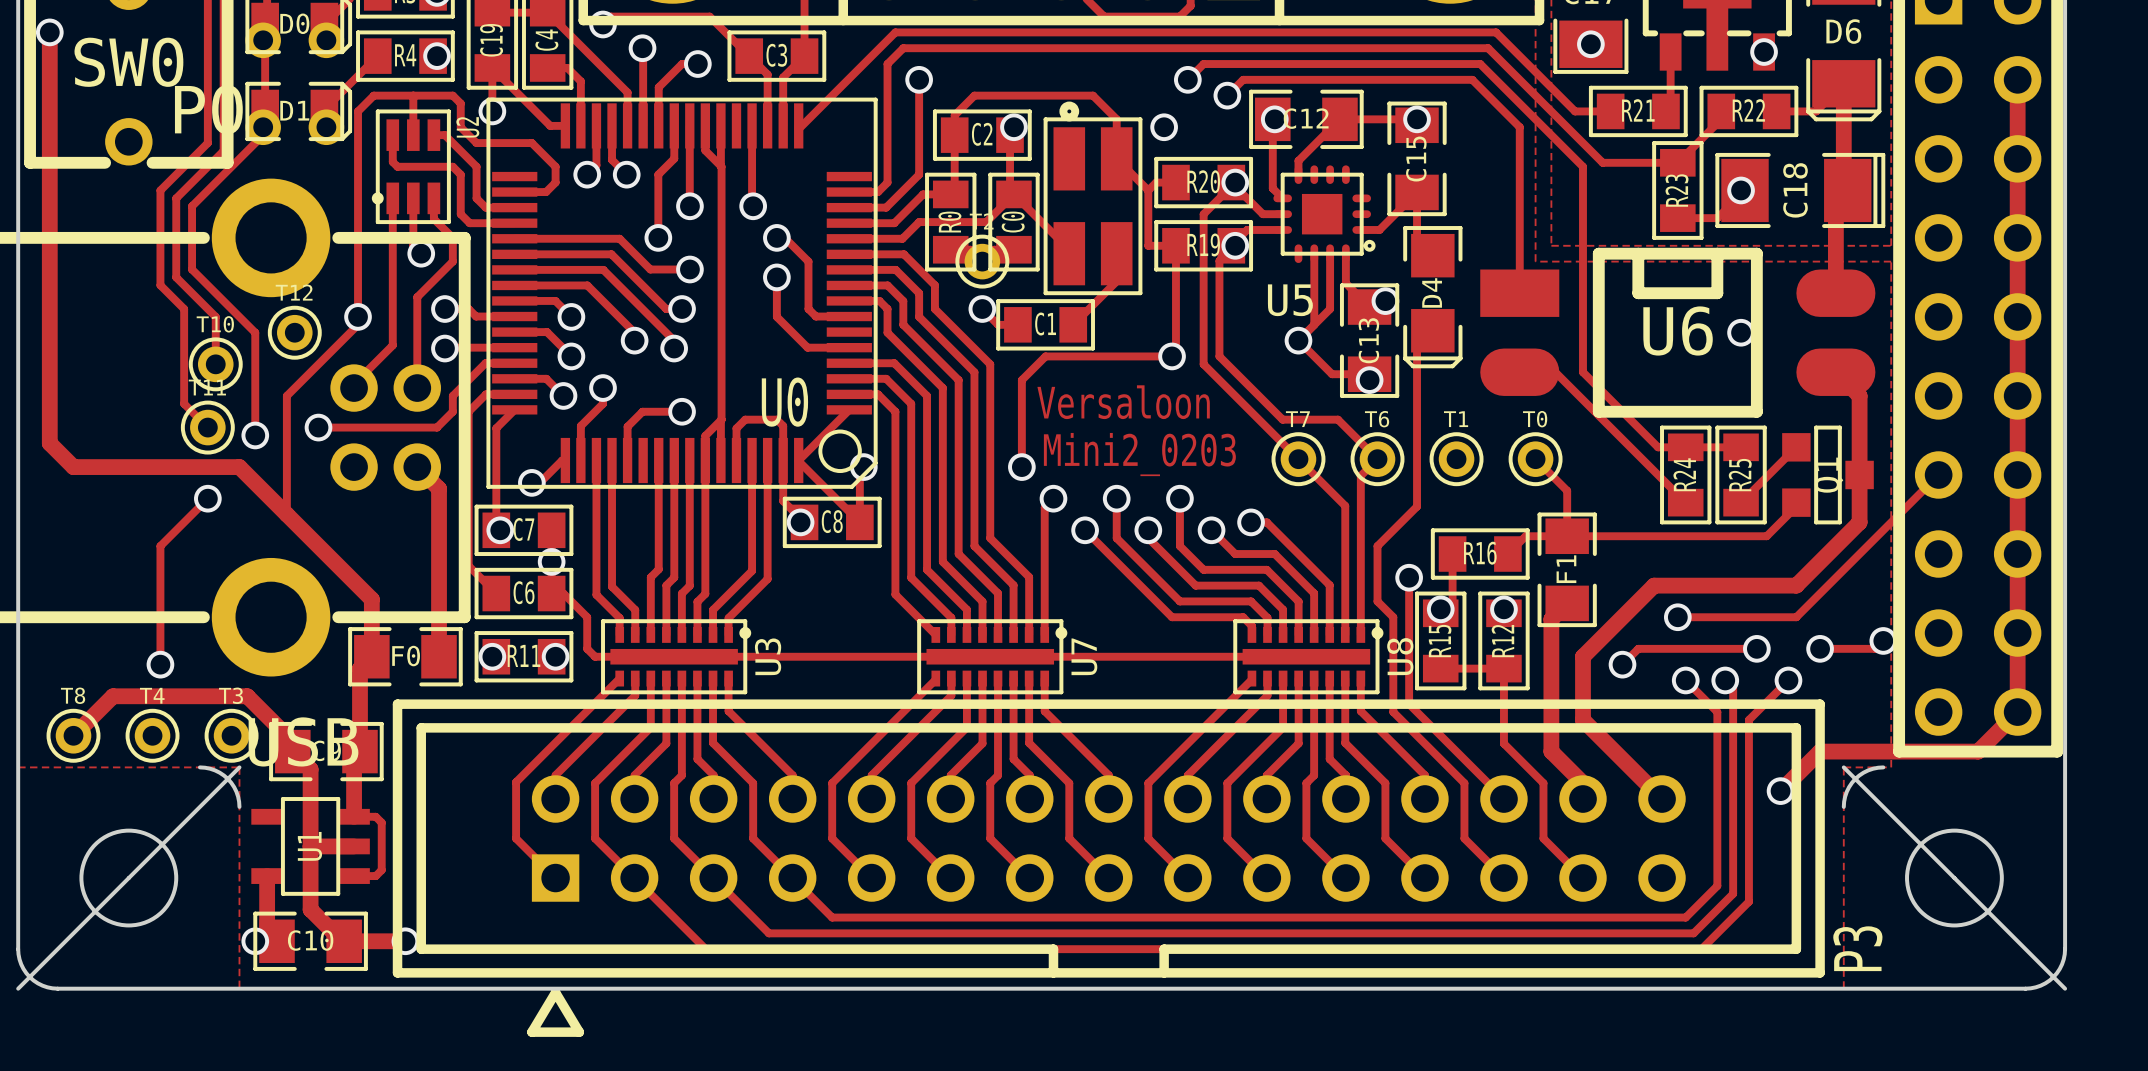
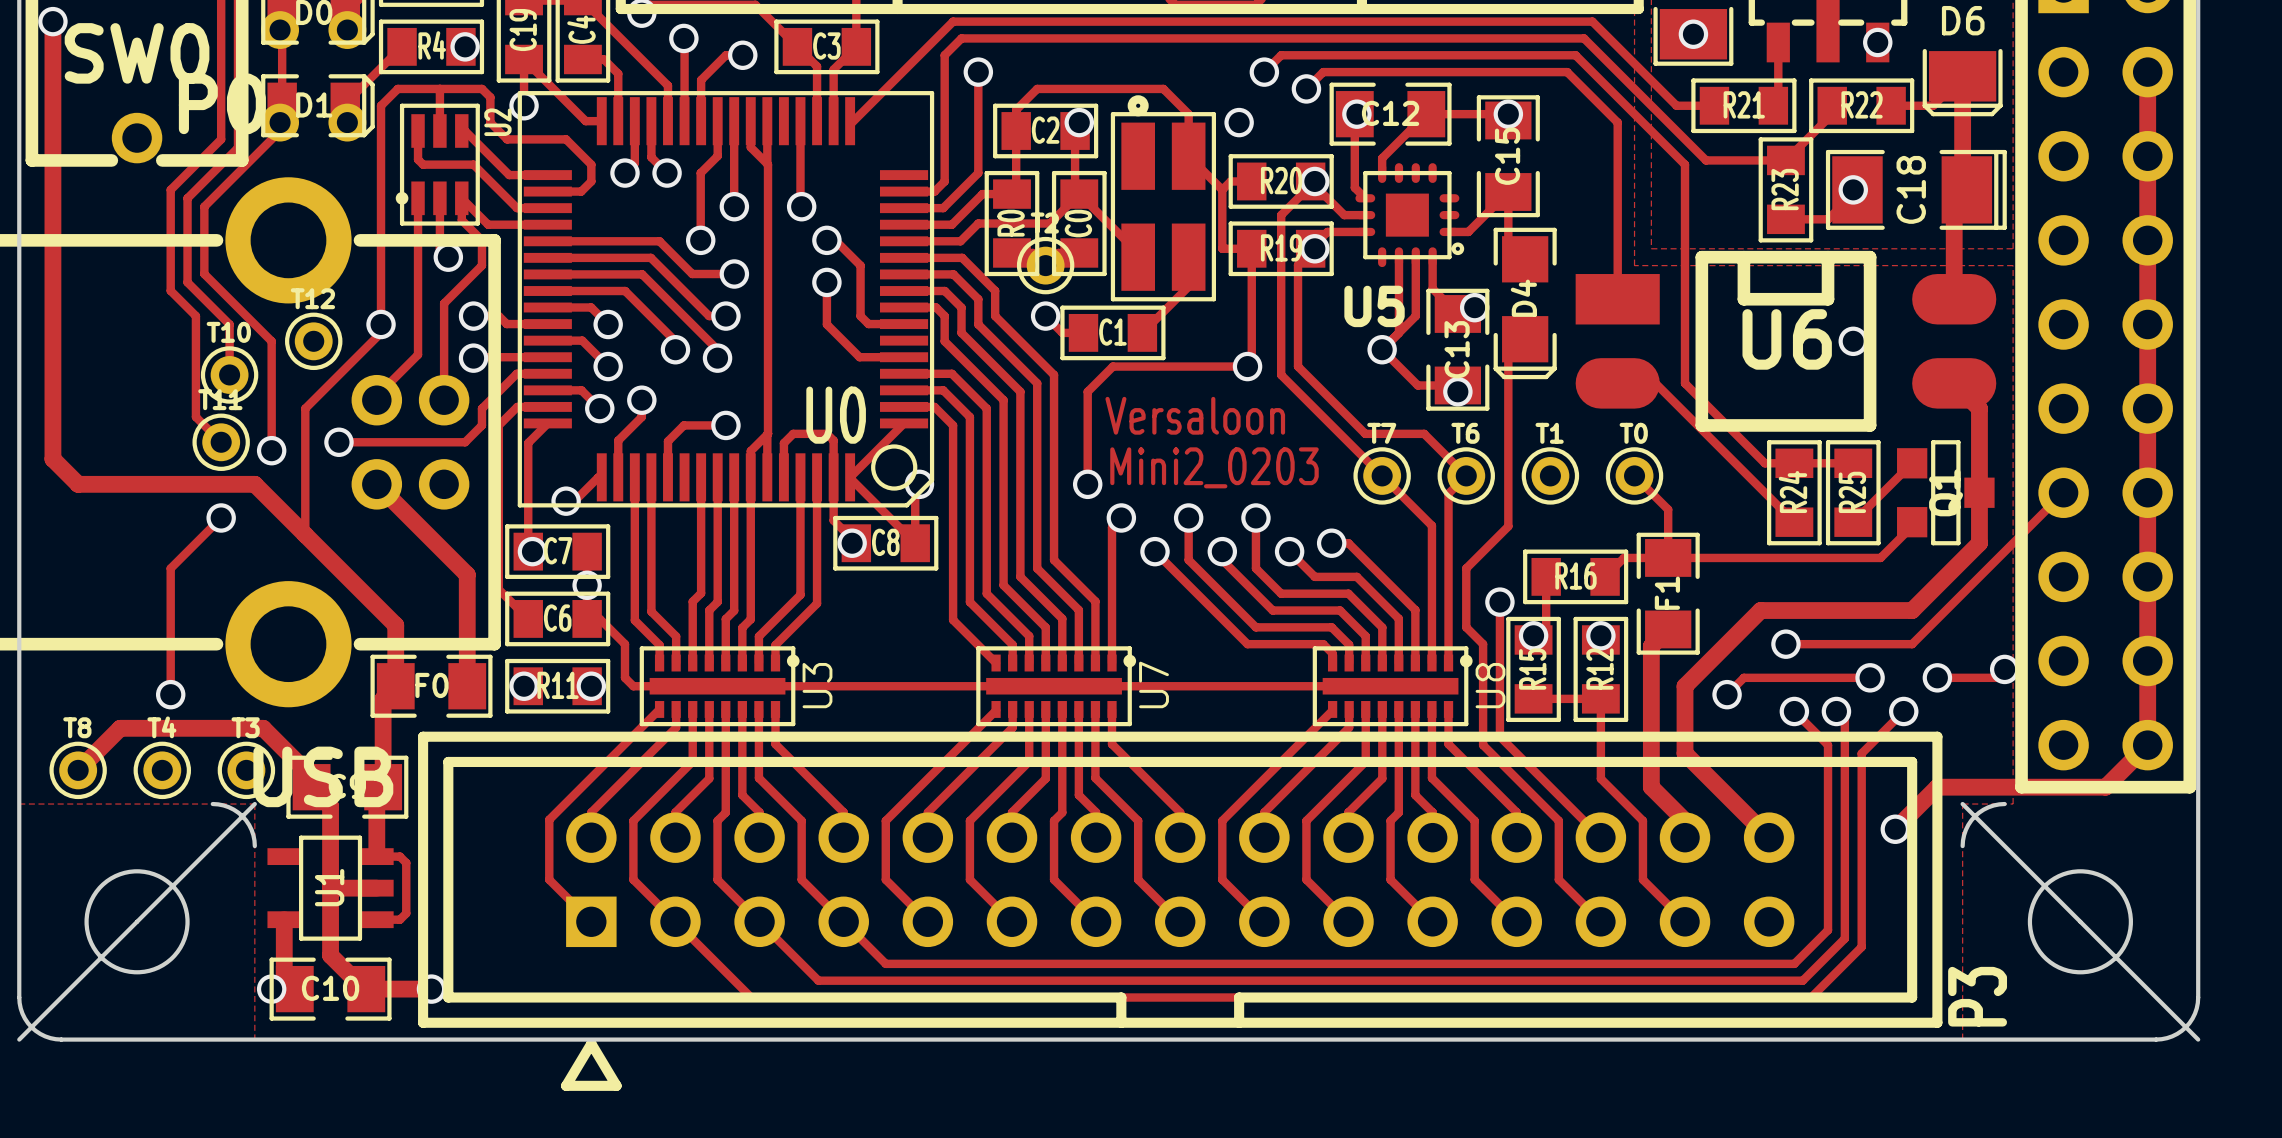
track: (437, 135) (444, 135) (476, 166) (476, 198) -> (465, 130) (509, 175) (547, 175)
track: (444, 166) (452, 166) (460, 174) (460, 214) (469, 223) -> (473, 164) (507, 198)
track: none -> (461, 198) (488, 224) (499, 224)
track: (417, 467) (439, 488) (439, 552) -> (376, 484) (467, 574)

